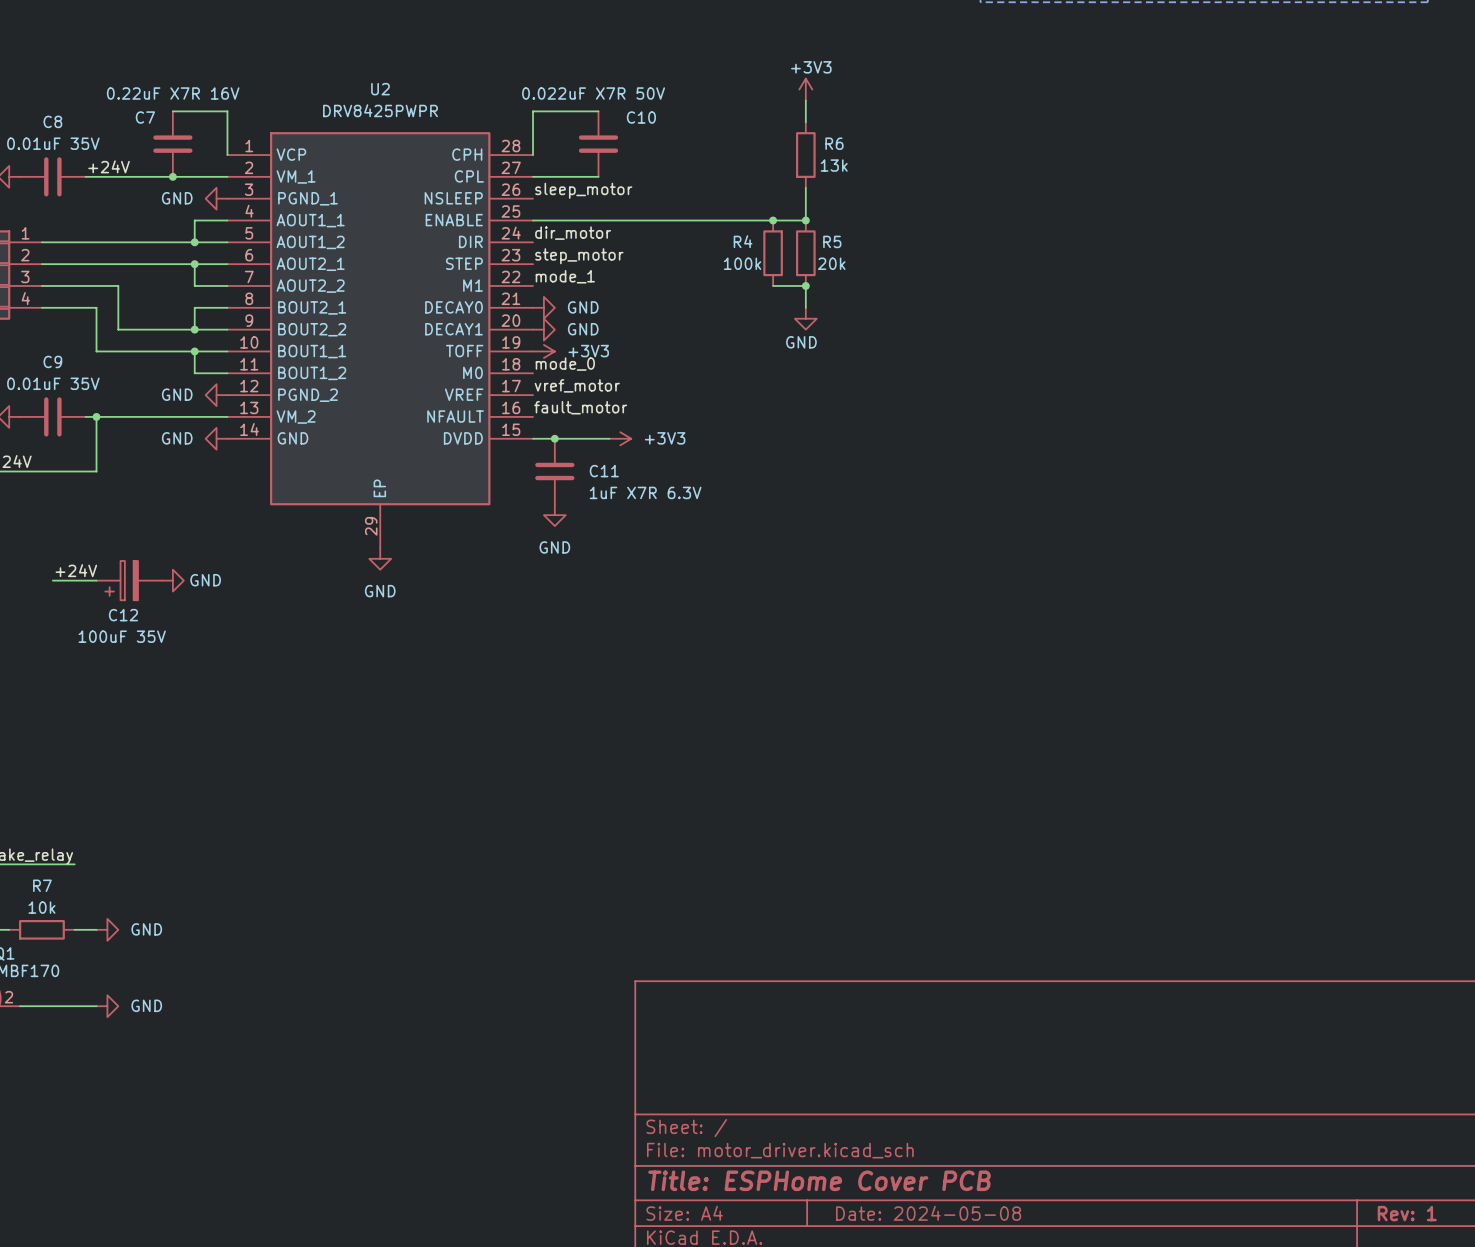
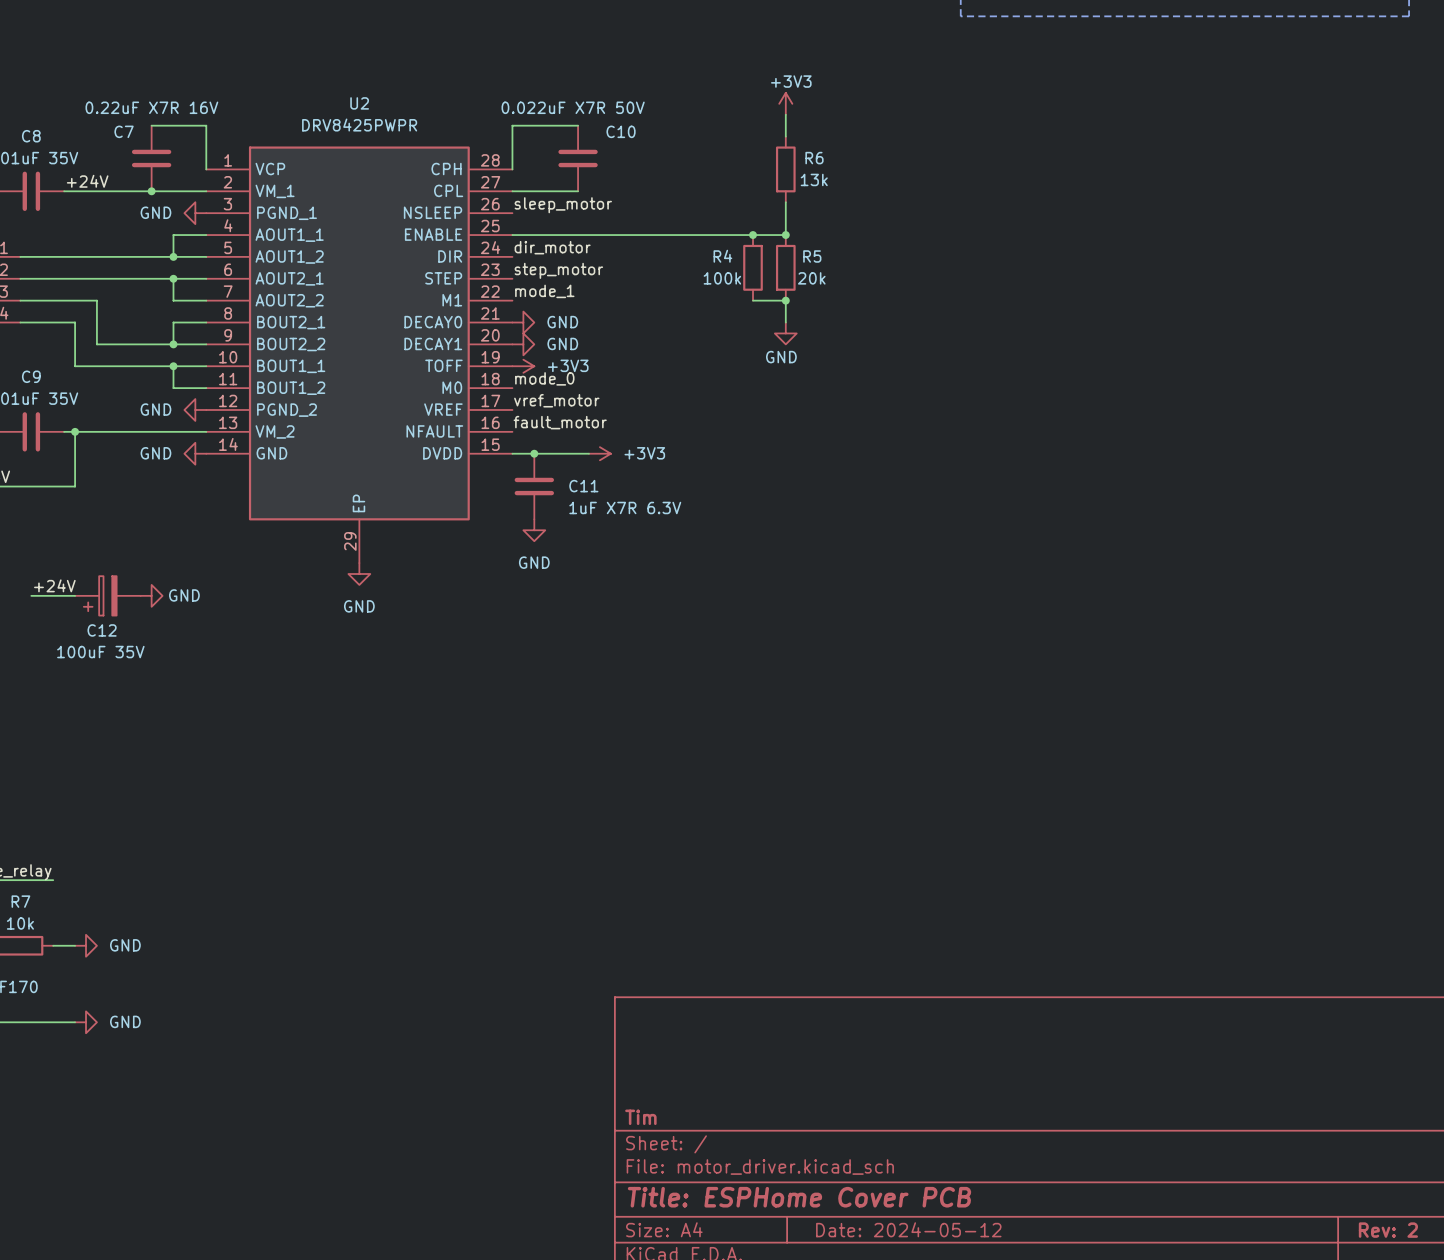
title block: none -> Tim (640, 1117)
title block: Date: 2024-05-08 (928, 1213) -> Date: 2024-05-12 (908, 1229)
title block: Rev: 1 (1407, 1213) -> Rev: 2 (1388, 1230)

